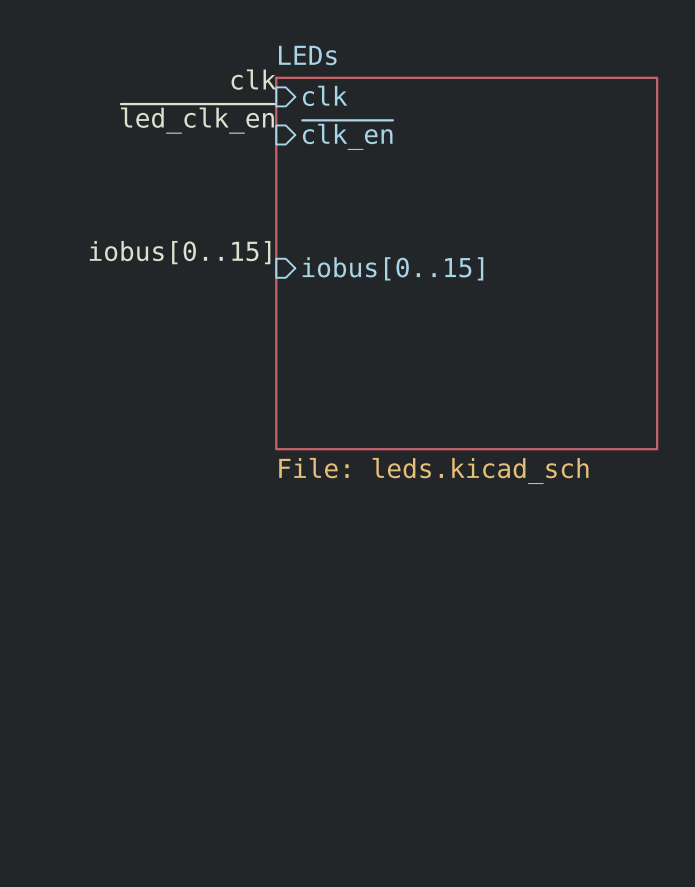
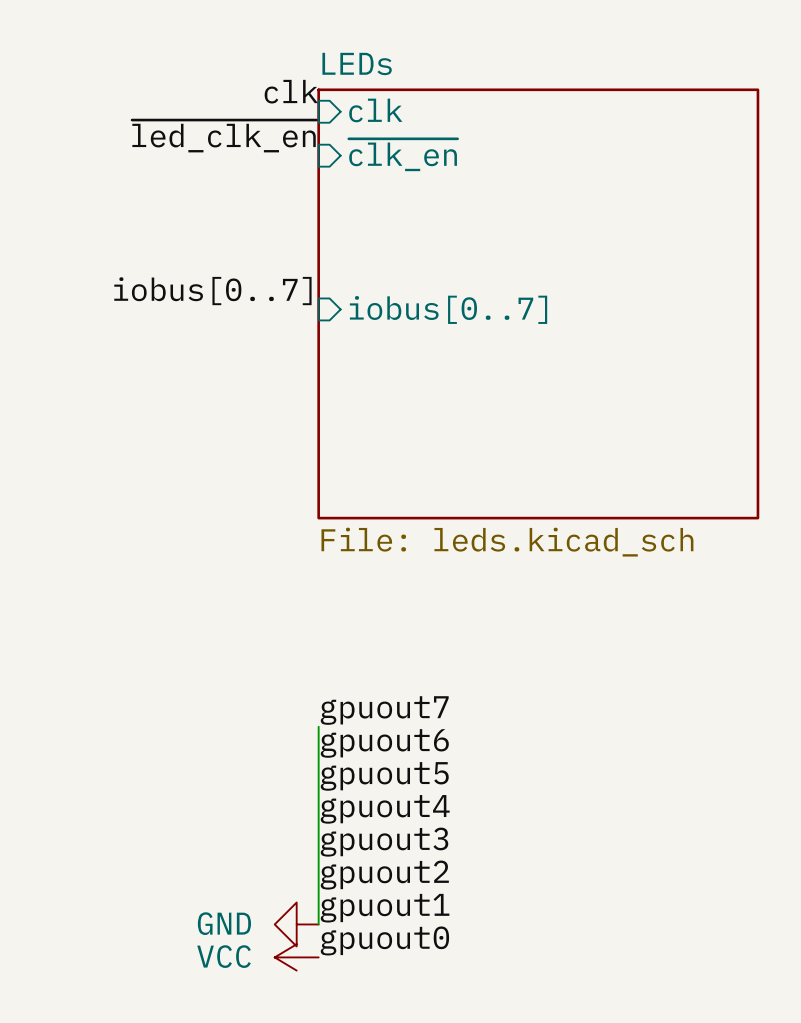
label: iobus[0..15] (180, 252) -> iobus[0..7] (212, 291)
sheet pin: iobus[0..15] (392, 268) -> iobus[0..7] (448, 309)
label: none -> gpuout7 (384, 710)
wire: none -> (318, 726) (318, 924)
label: none -> gpuout6 (384, 743)
label: none -> gpuout5 (384, 776)
label: none -> gpuout4 (385, 809)
label: none -> gpuout3 (384, 842)
label: none -> gpuout2 (384, 875)
label: none -> gpuout1 (385, 908)
power symbol: none -> GND (296, 924)
label: none -> gpuout0 (384, 940)
power symbol: none -> VCC (296, 957)

